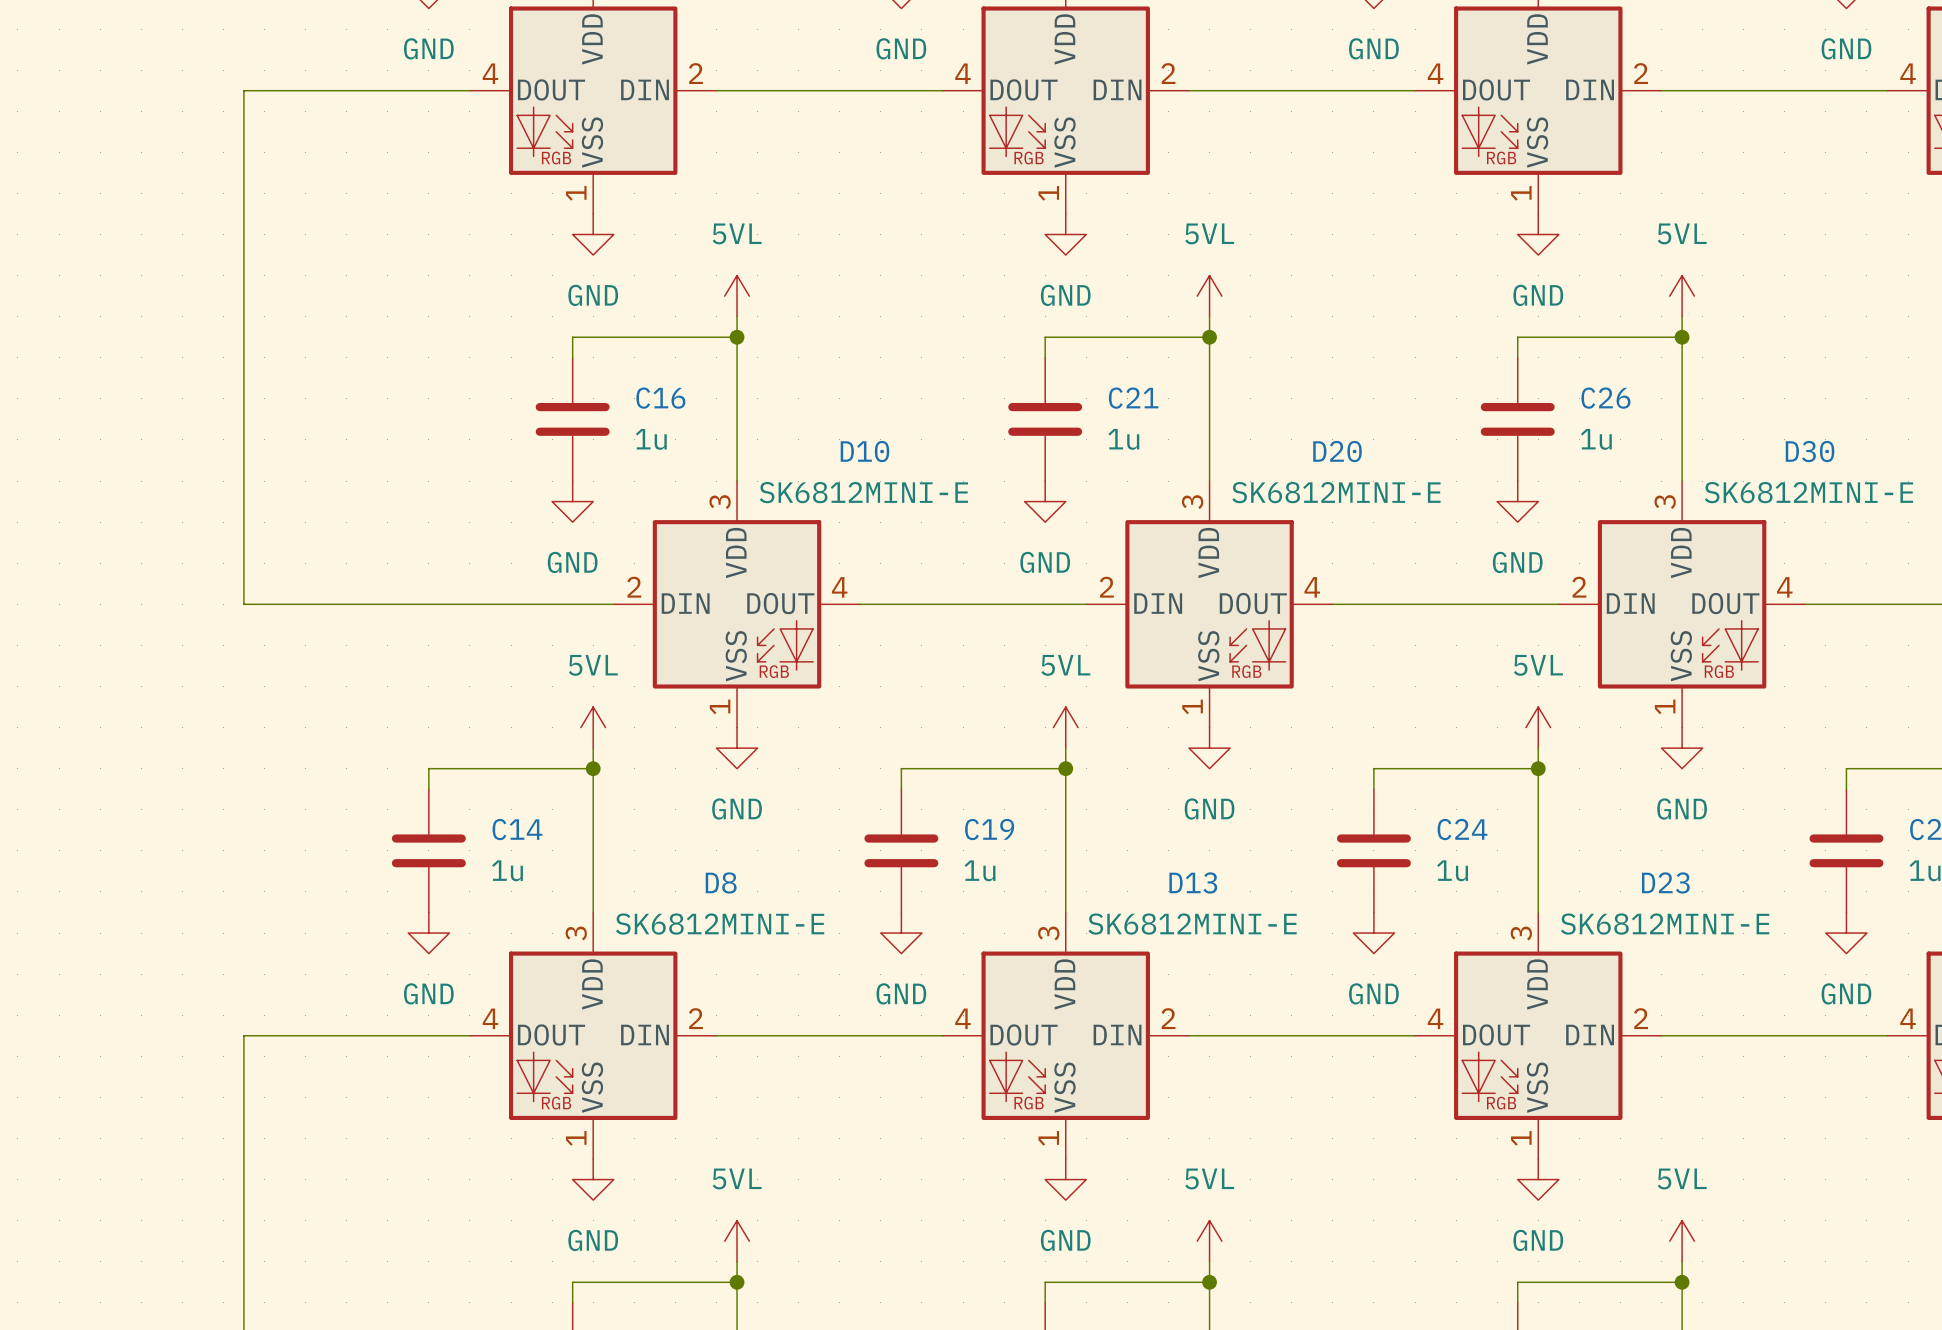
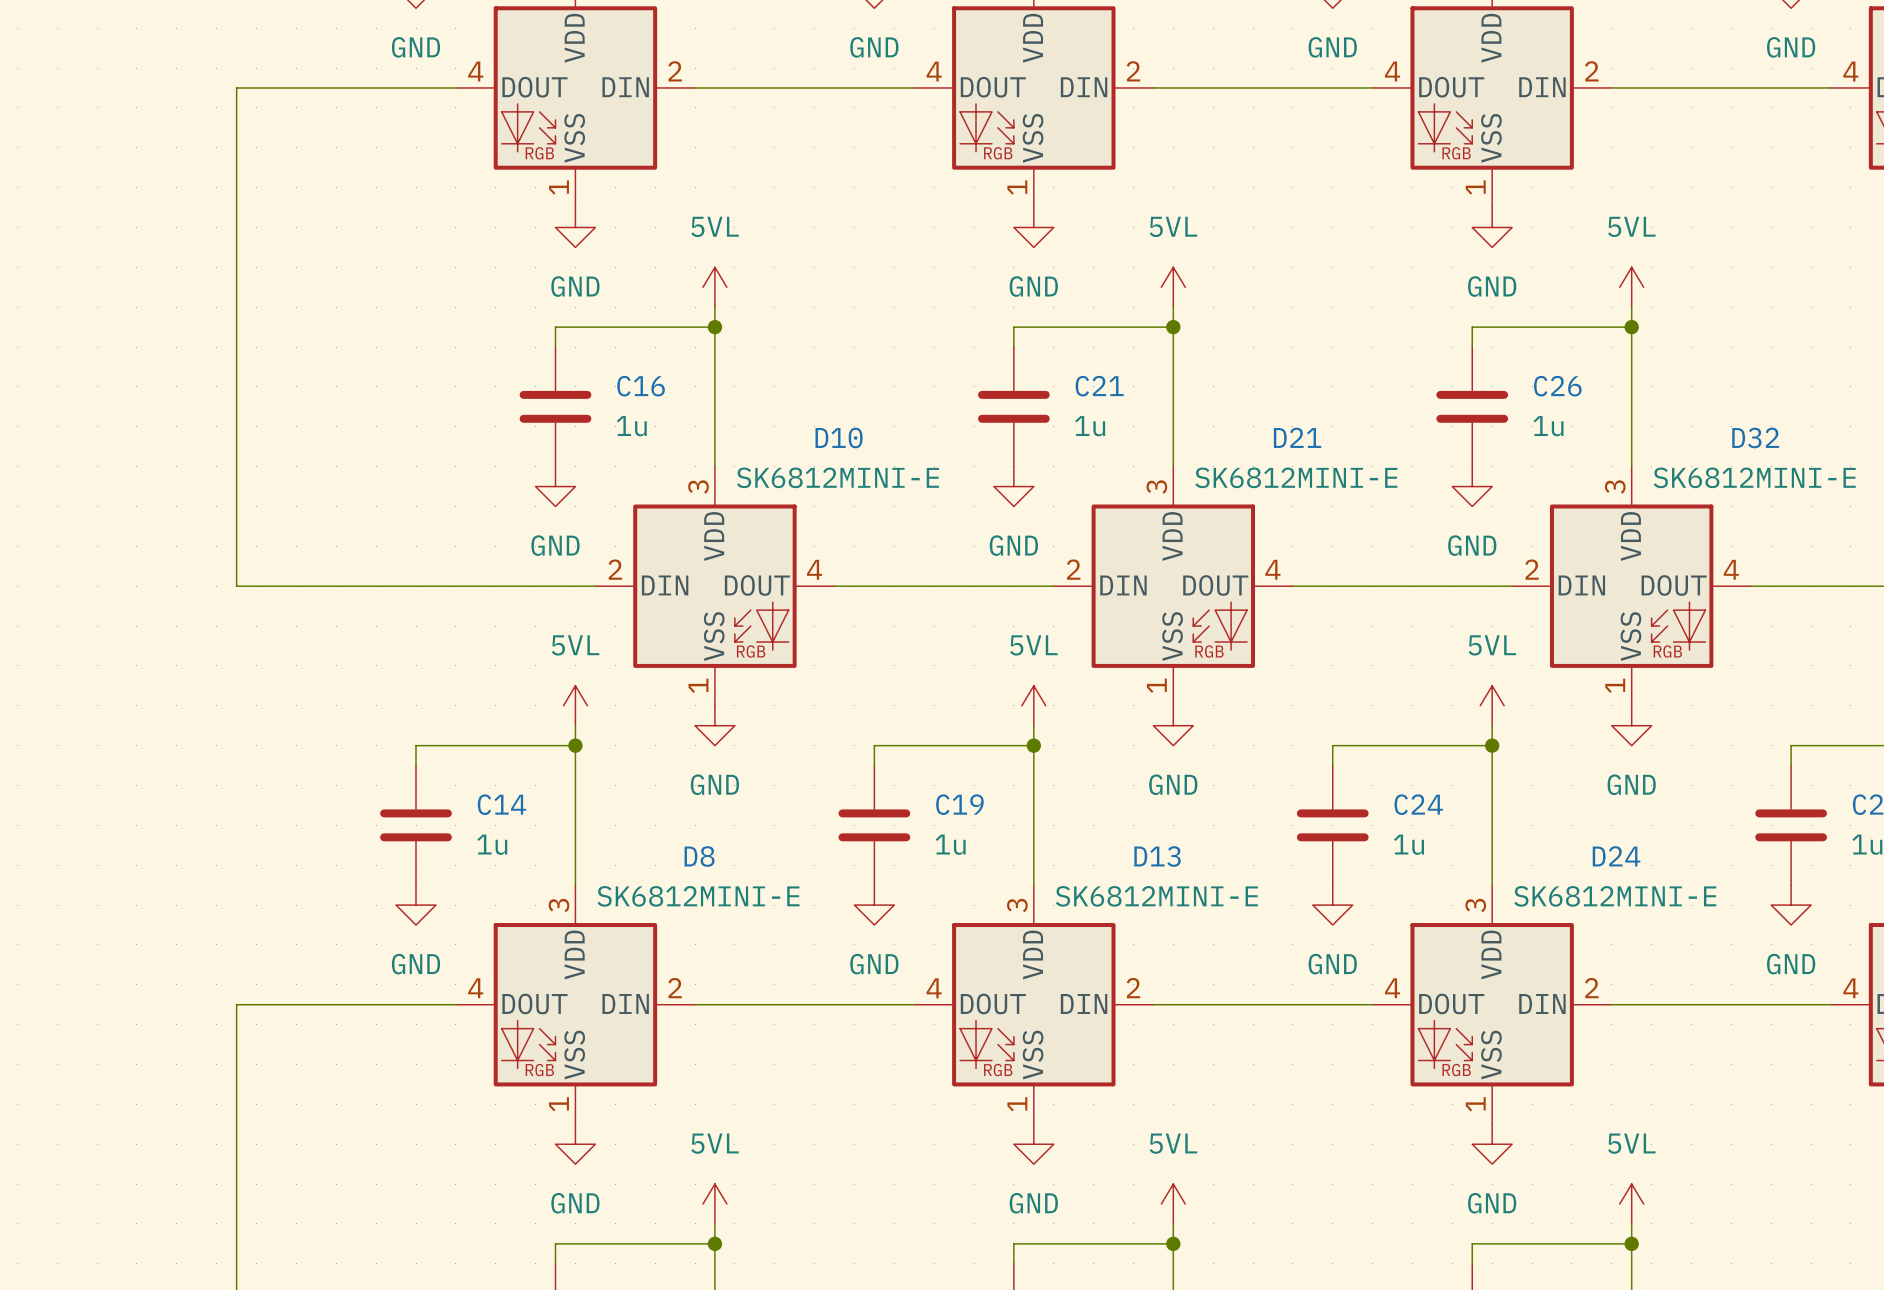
D20 name: D20 (1337, 451) -> D21 (1297, 437)
D30 name: D30 (1810, 451) -> D32 (1755, 437)
D23 name: D23 (1665, 882) -> D24 (1616, 856)

